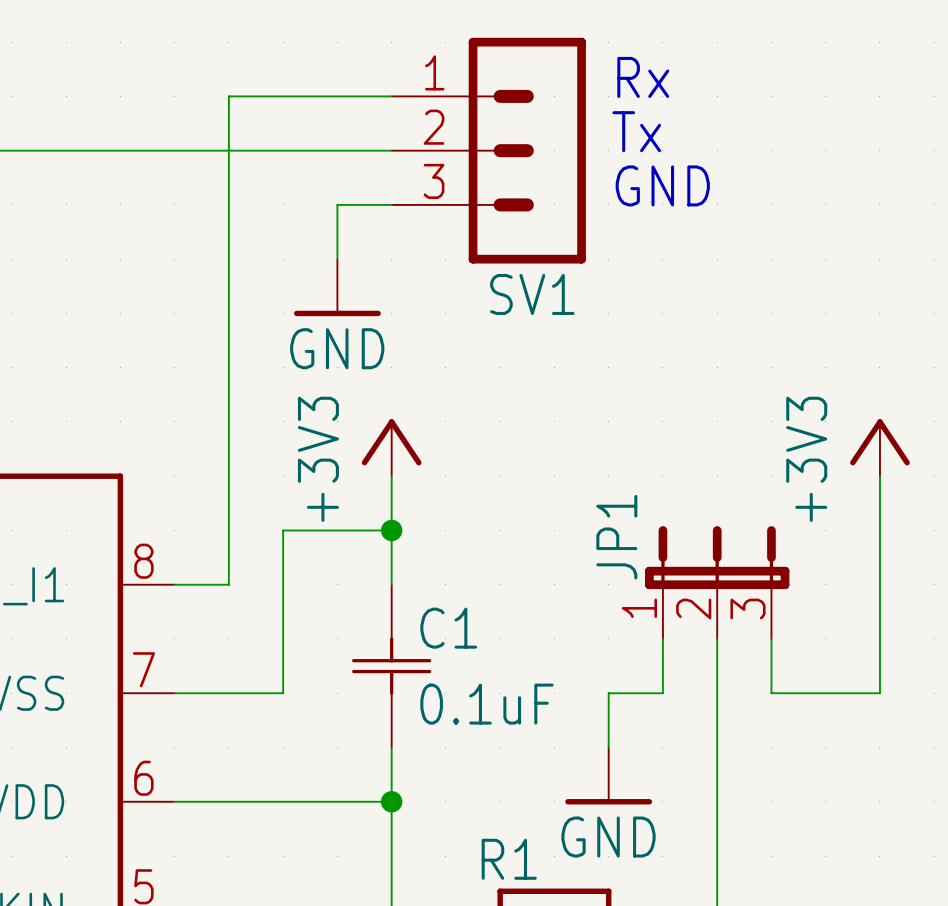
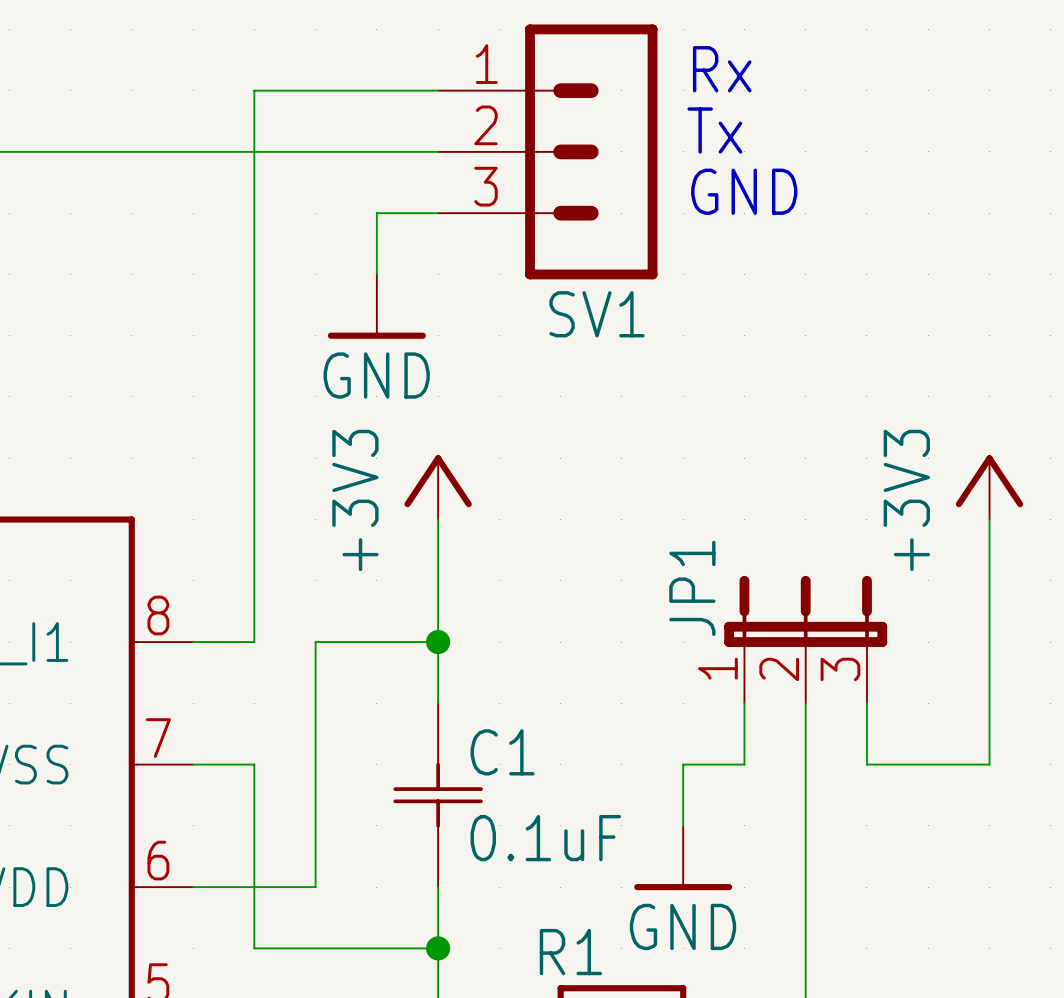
wire: (391, 530) (283, 530) (283, 584) -> (438, 703) (438, 642) (315, 642)
junction position: (391, 530) -> (438, 642)
C1 position: (391, 666) -> (438, 795)
wire: (228, 693) (283, 693) -> (254, 764) (254, 948) (438, 948)
wire: (391, 747) (391, 801) (283, 801) -> (315, 764) (315, 887)
junction position: (391, 801) -> (438, 948)

